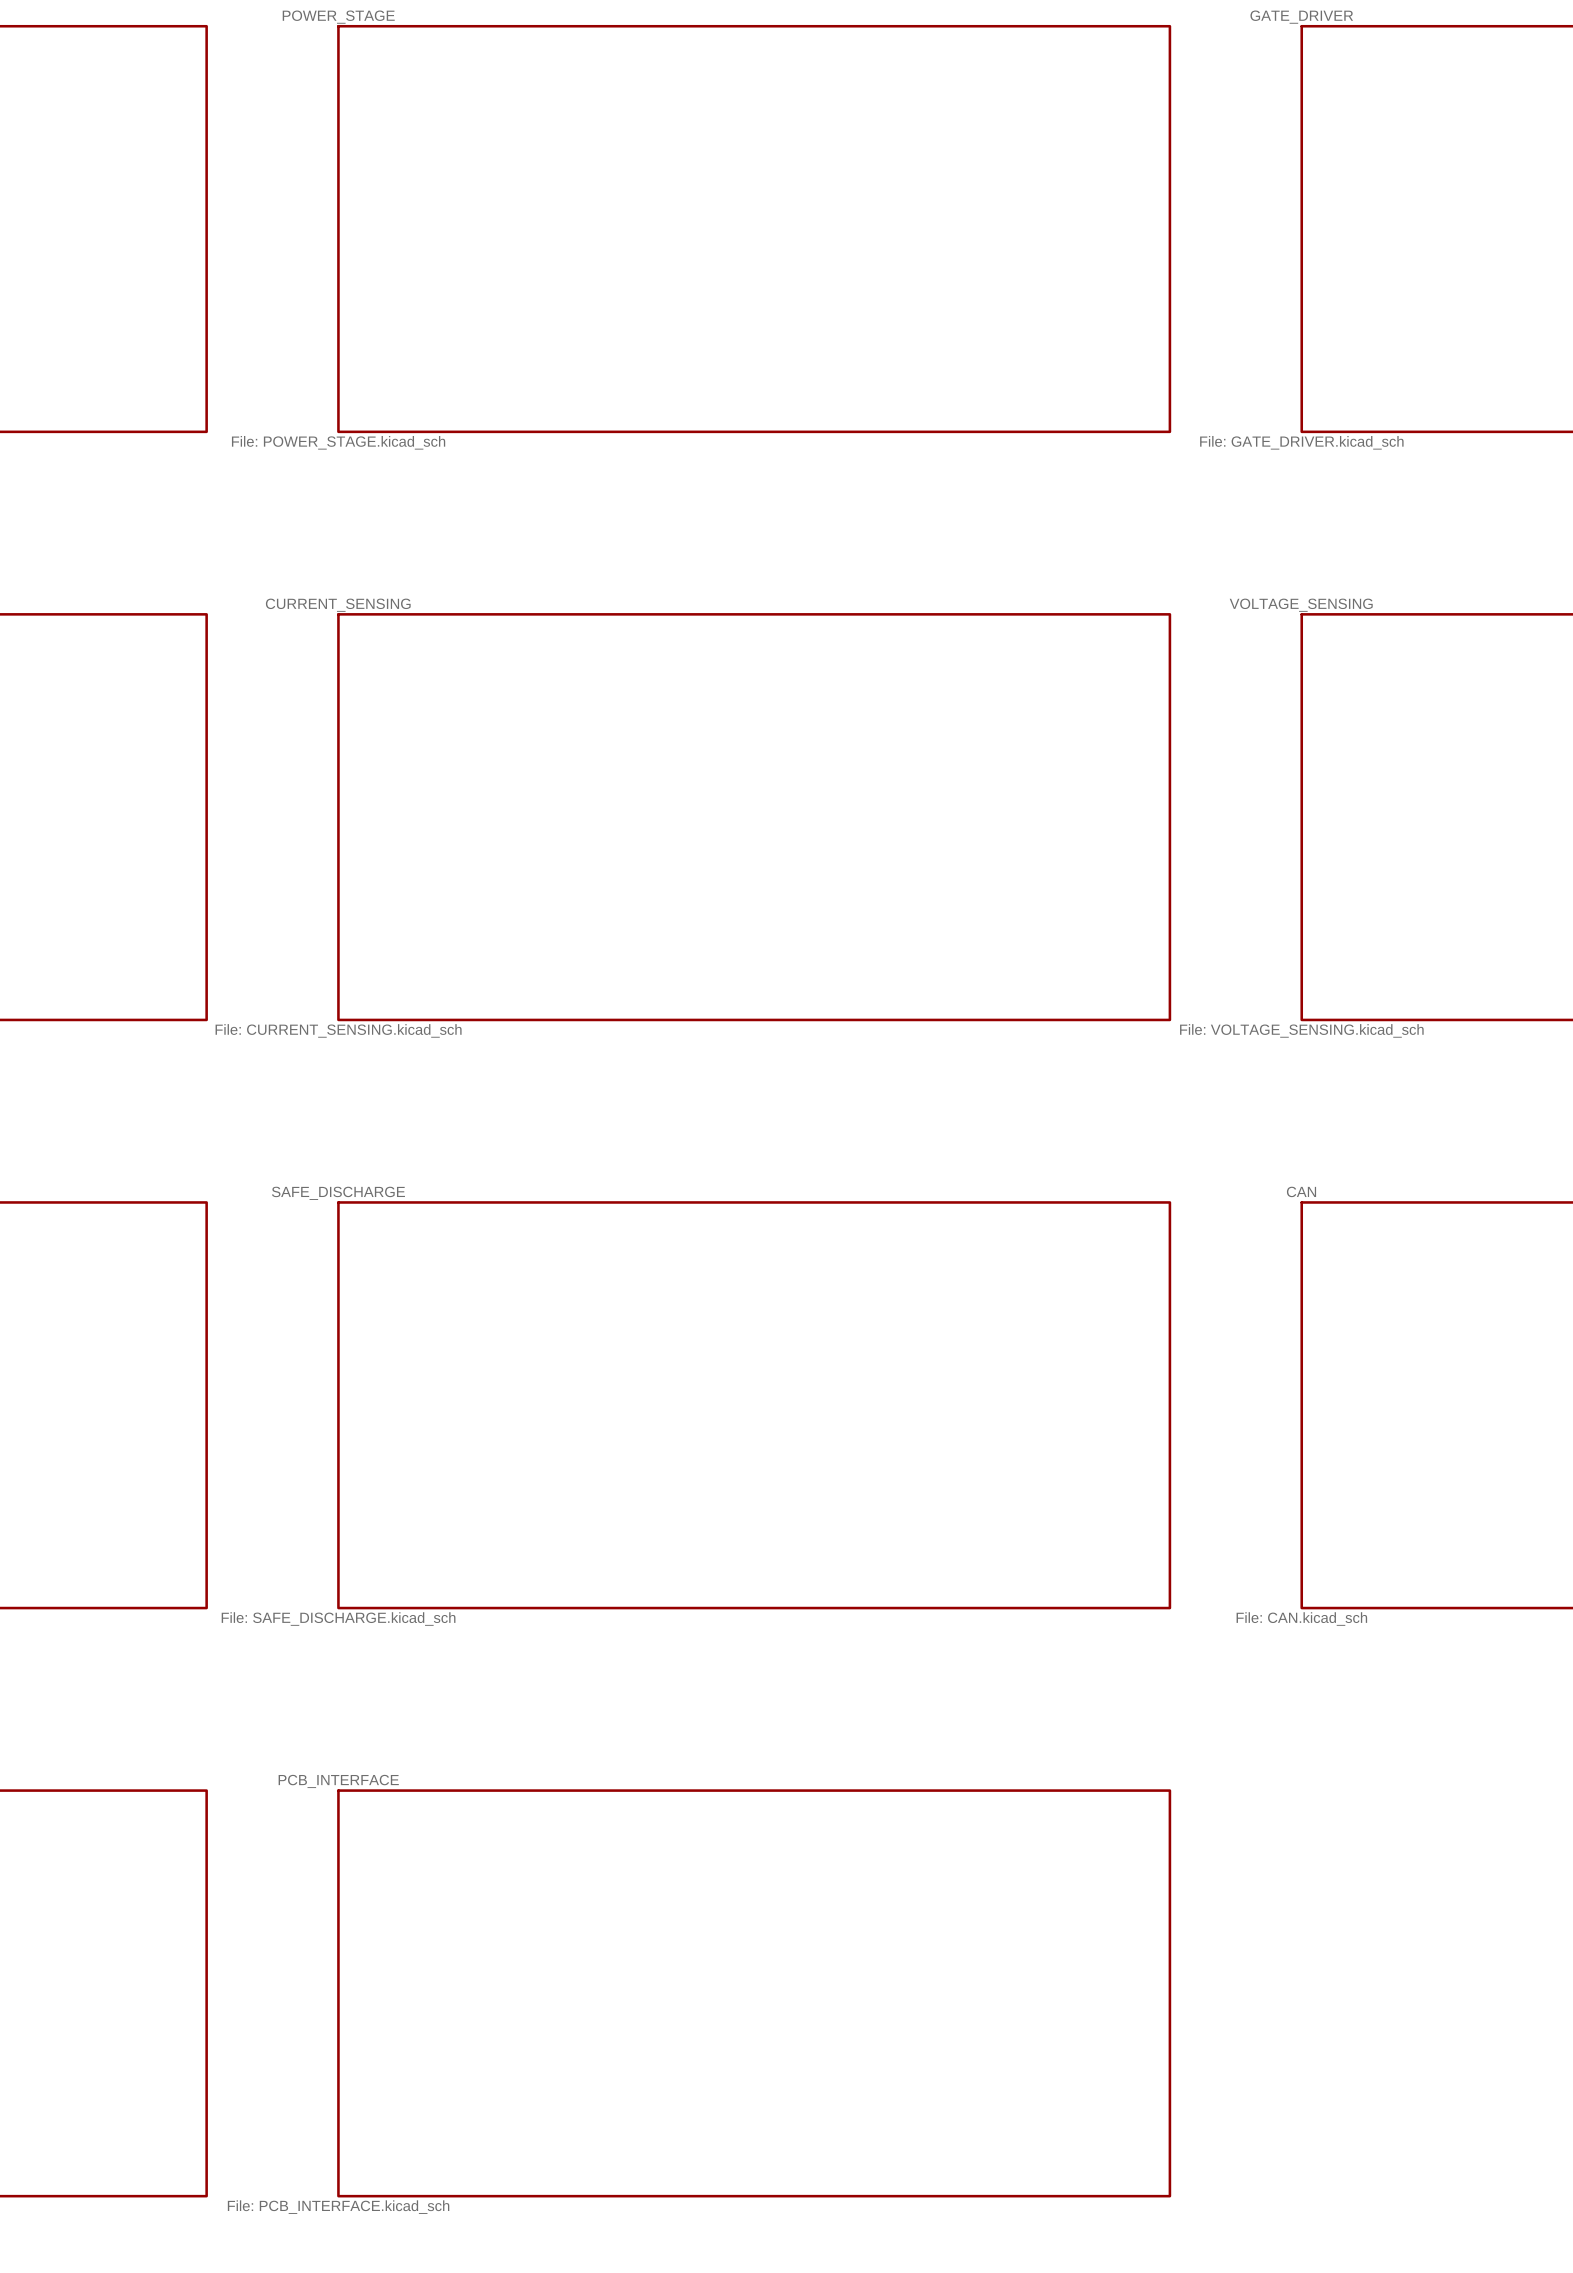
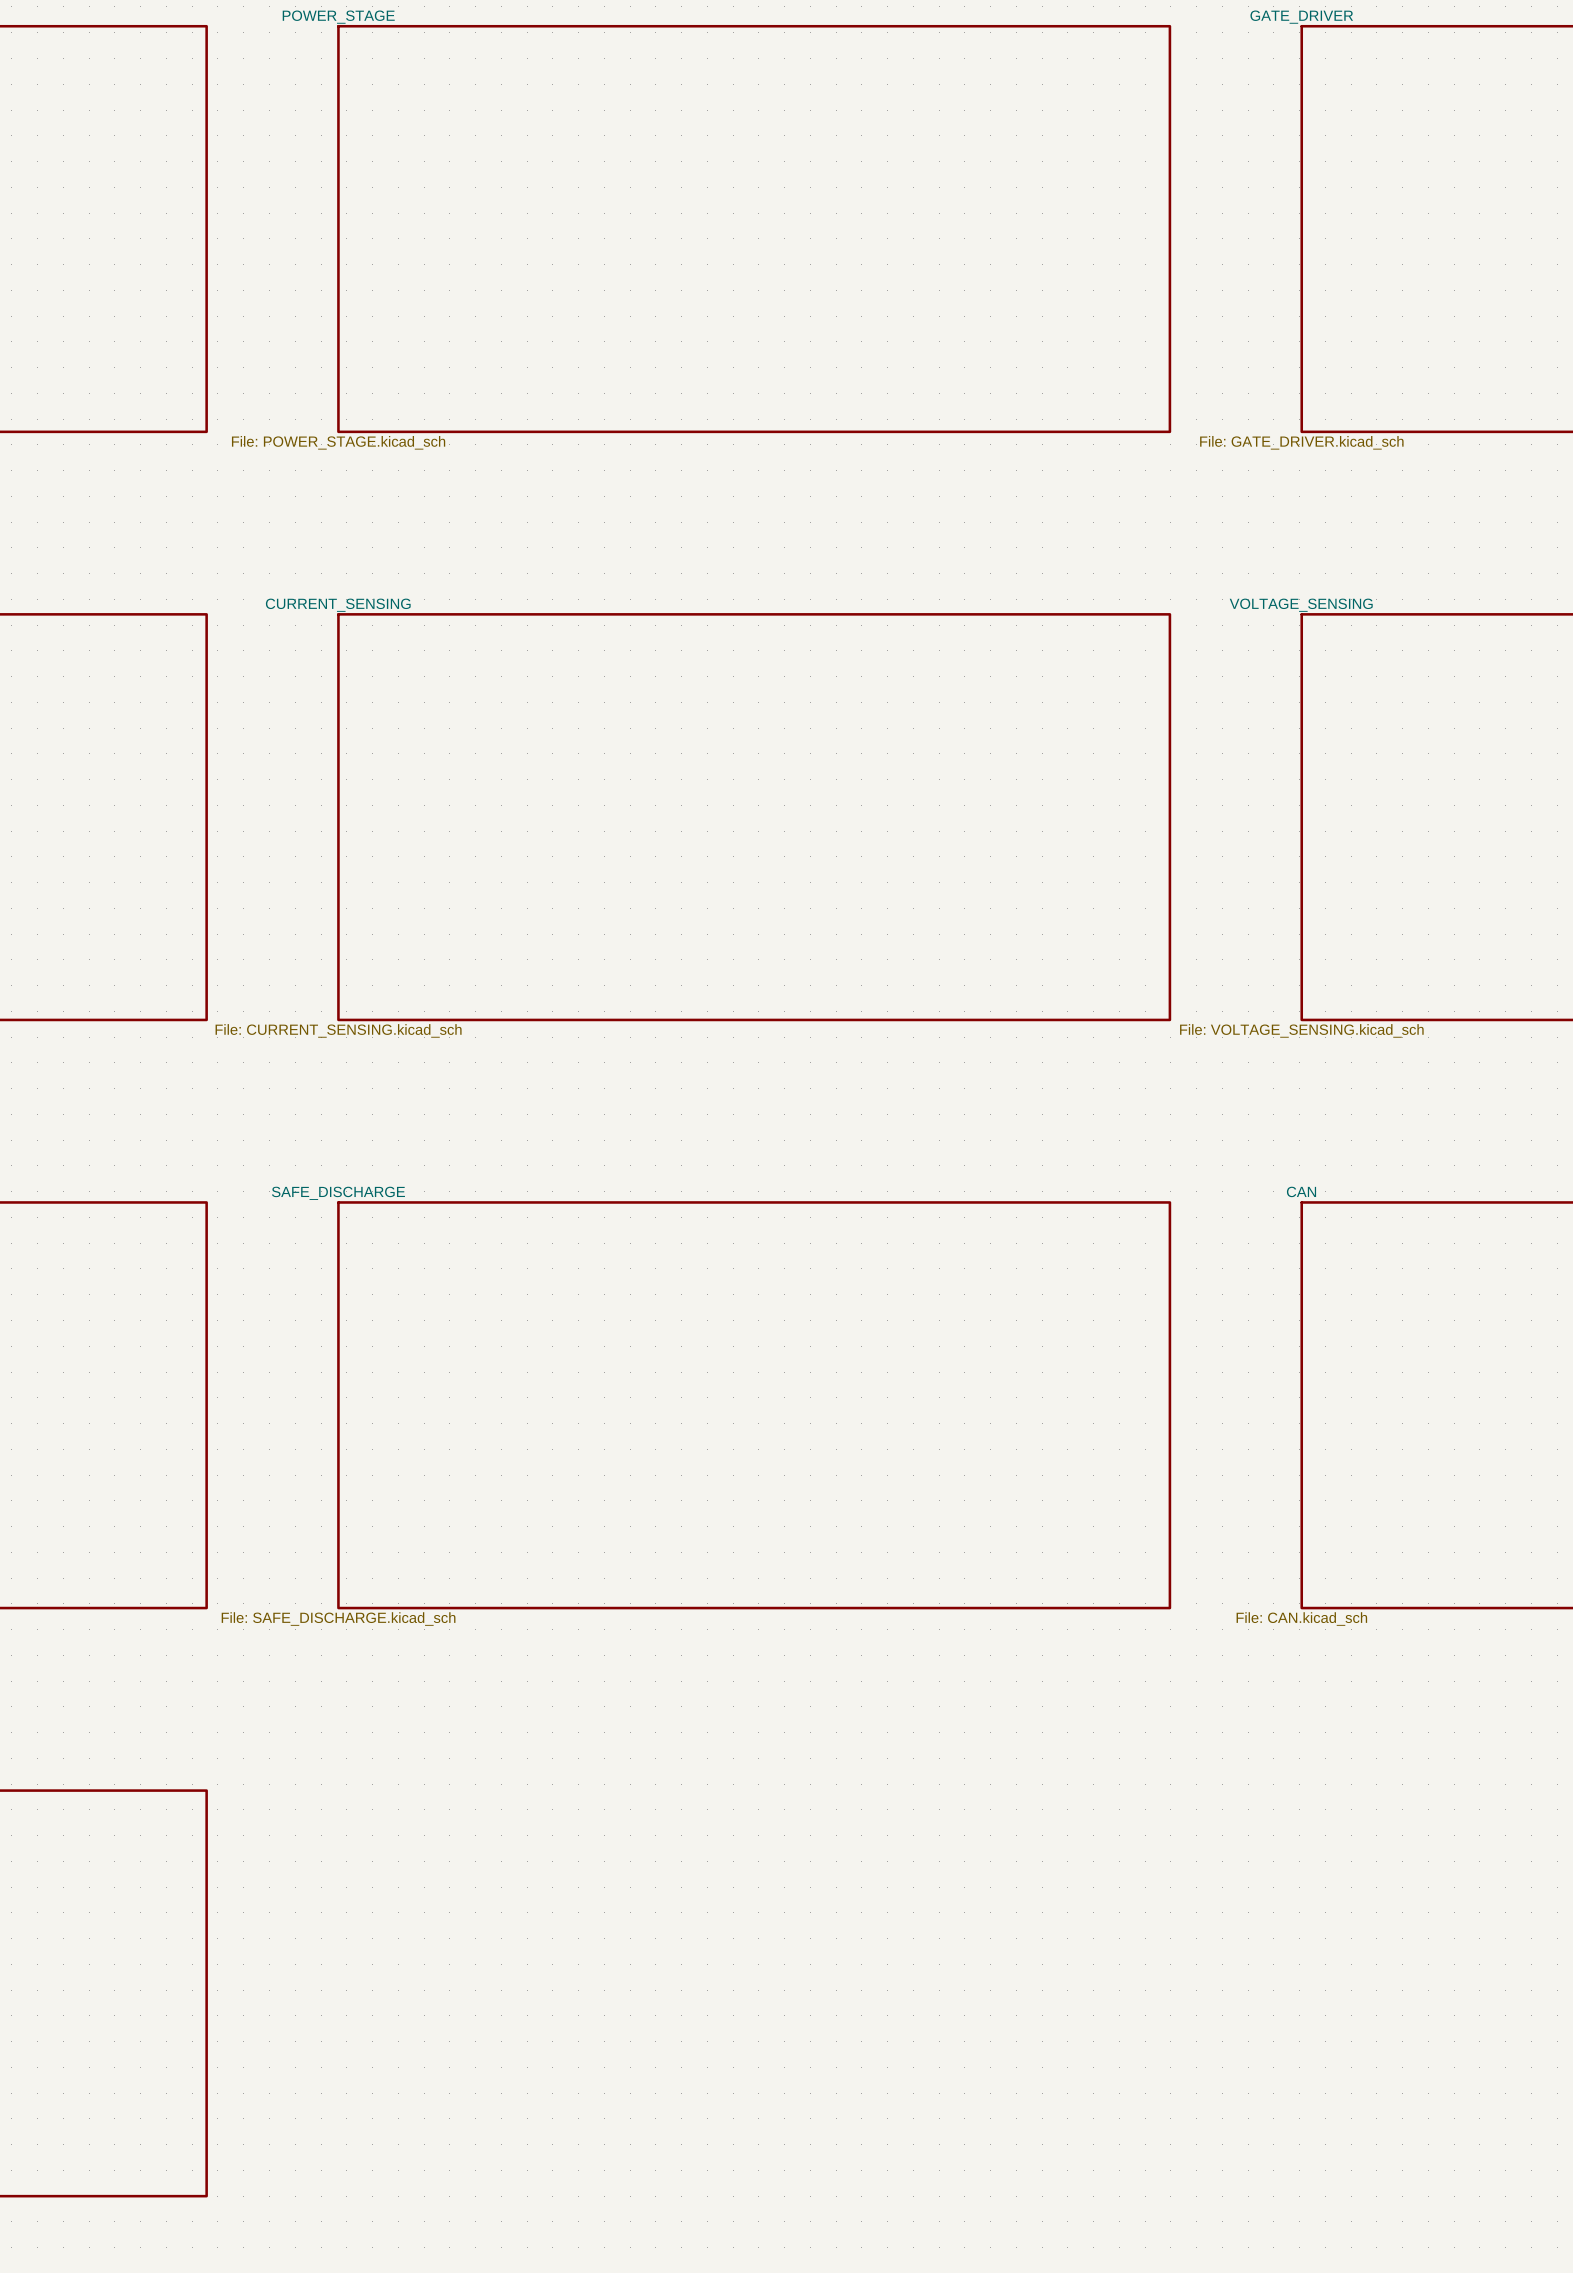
sheet PCB_INTERFACE: File: PCB_INTERFACE.kicad_sch (754, 1993) -> none

